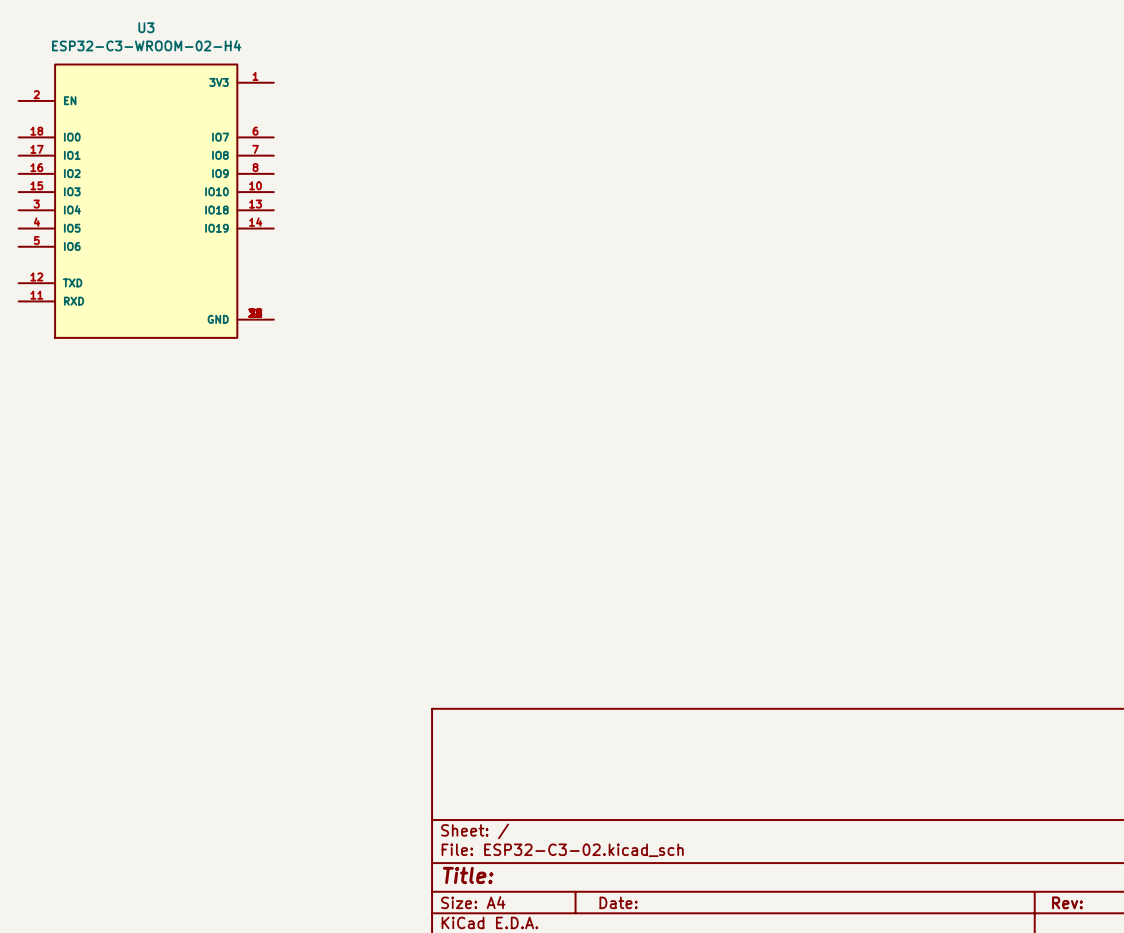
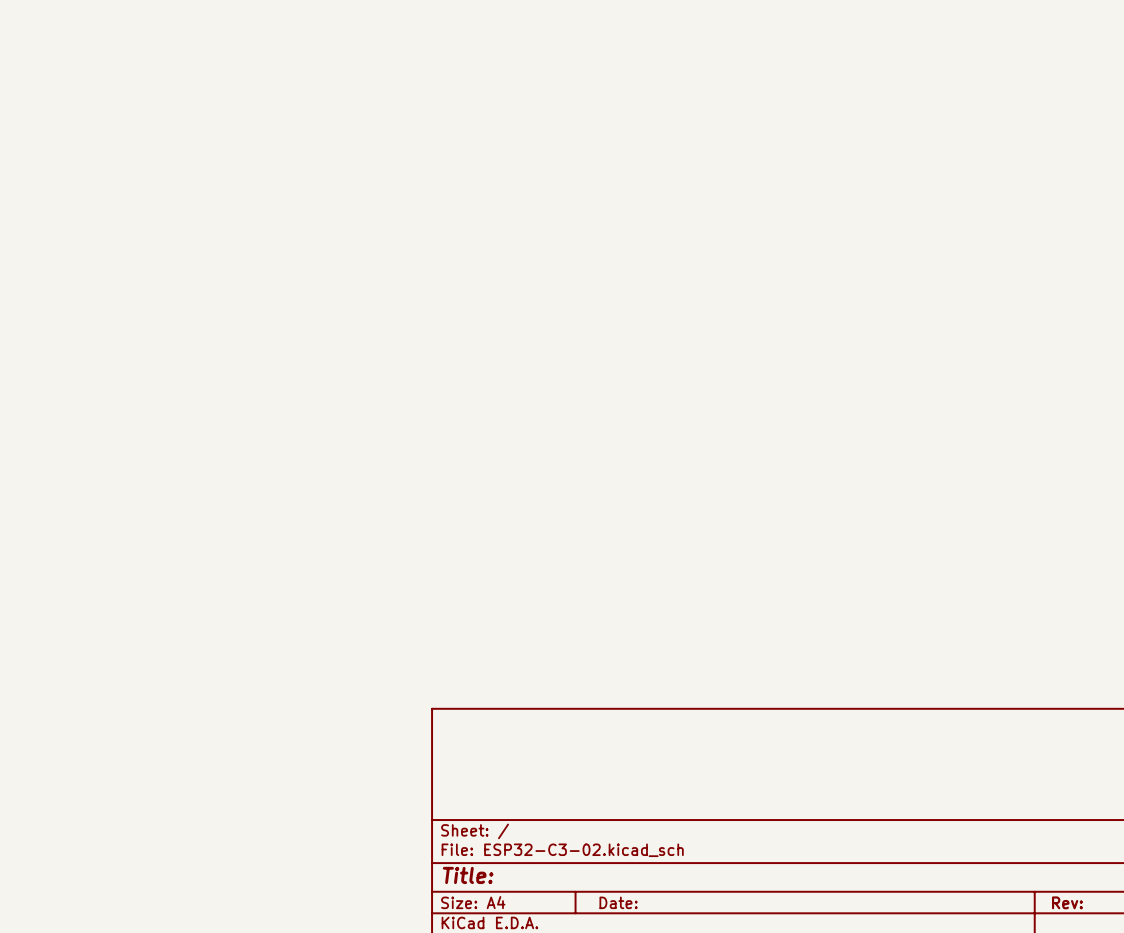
U3: ESP32-C3-WROOM-02-H4 (146, 201) -> none

